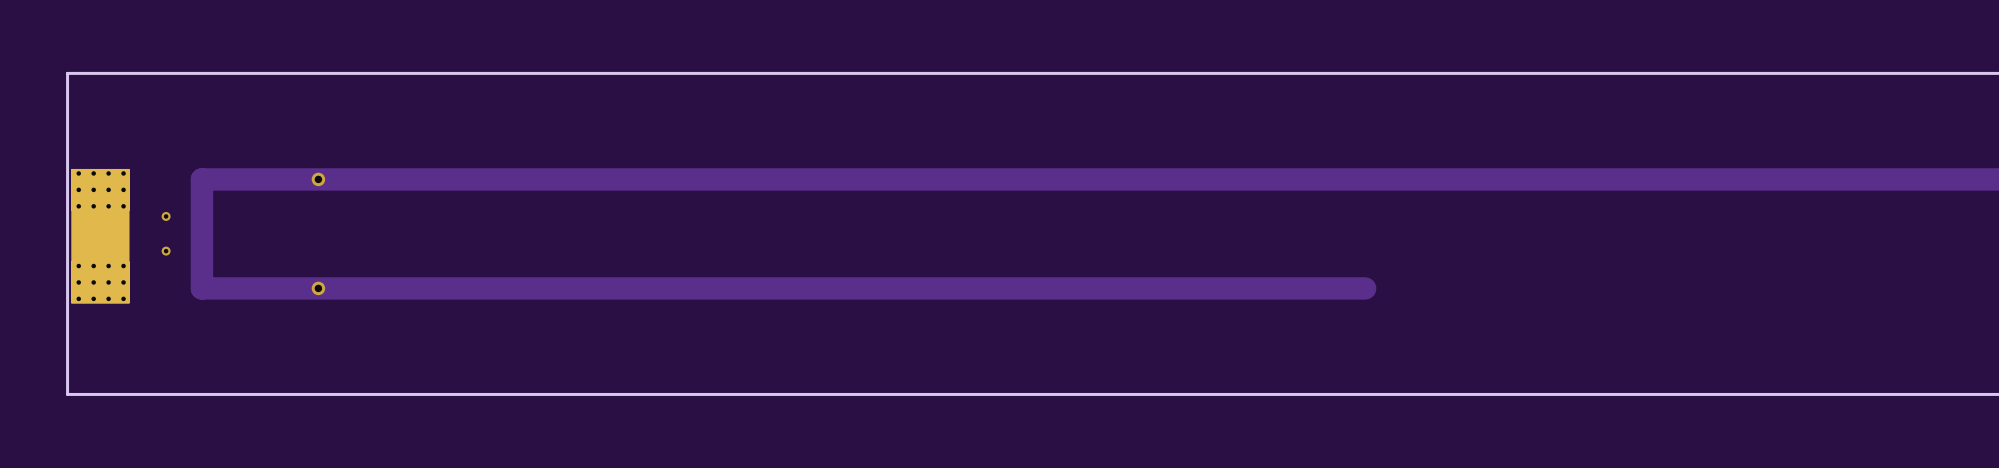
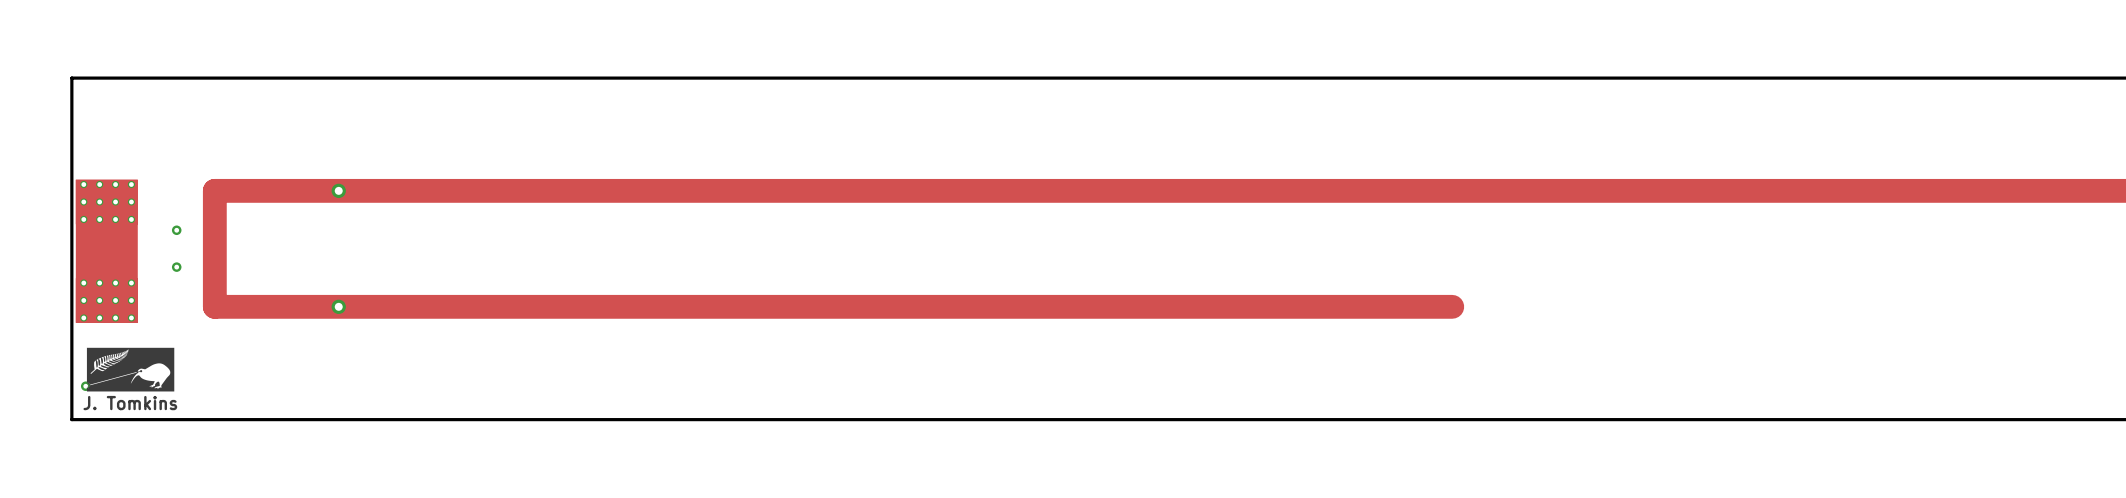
drawing: none -> [86, 347, 175, 392]
via: none -> (85, 386)
text: none -> J. Tomkins (130, 403)

